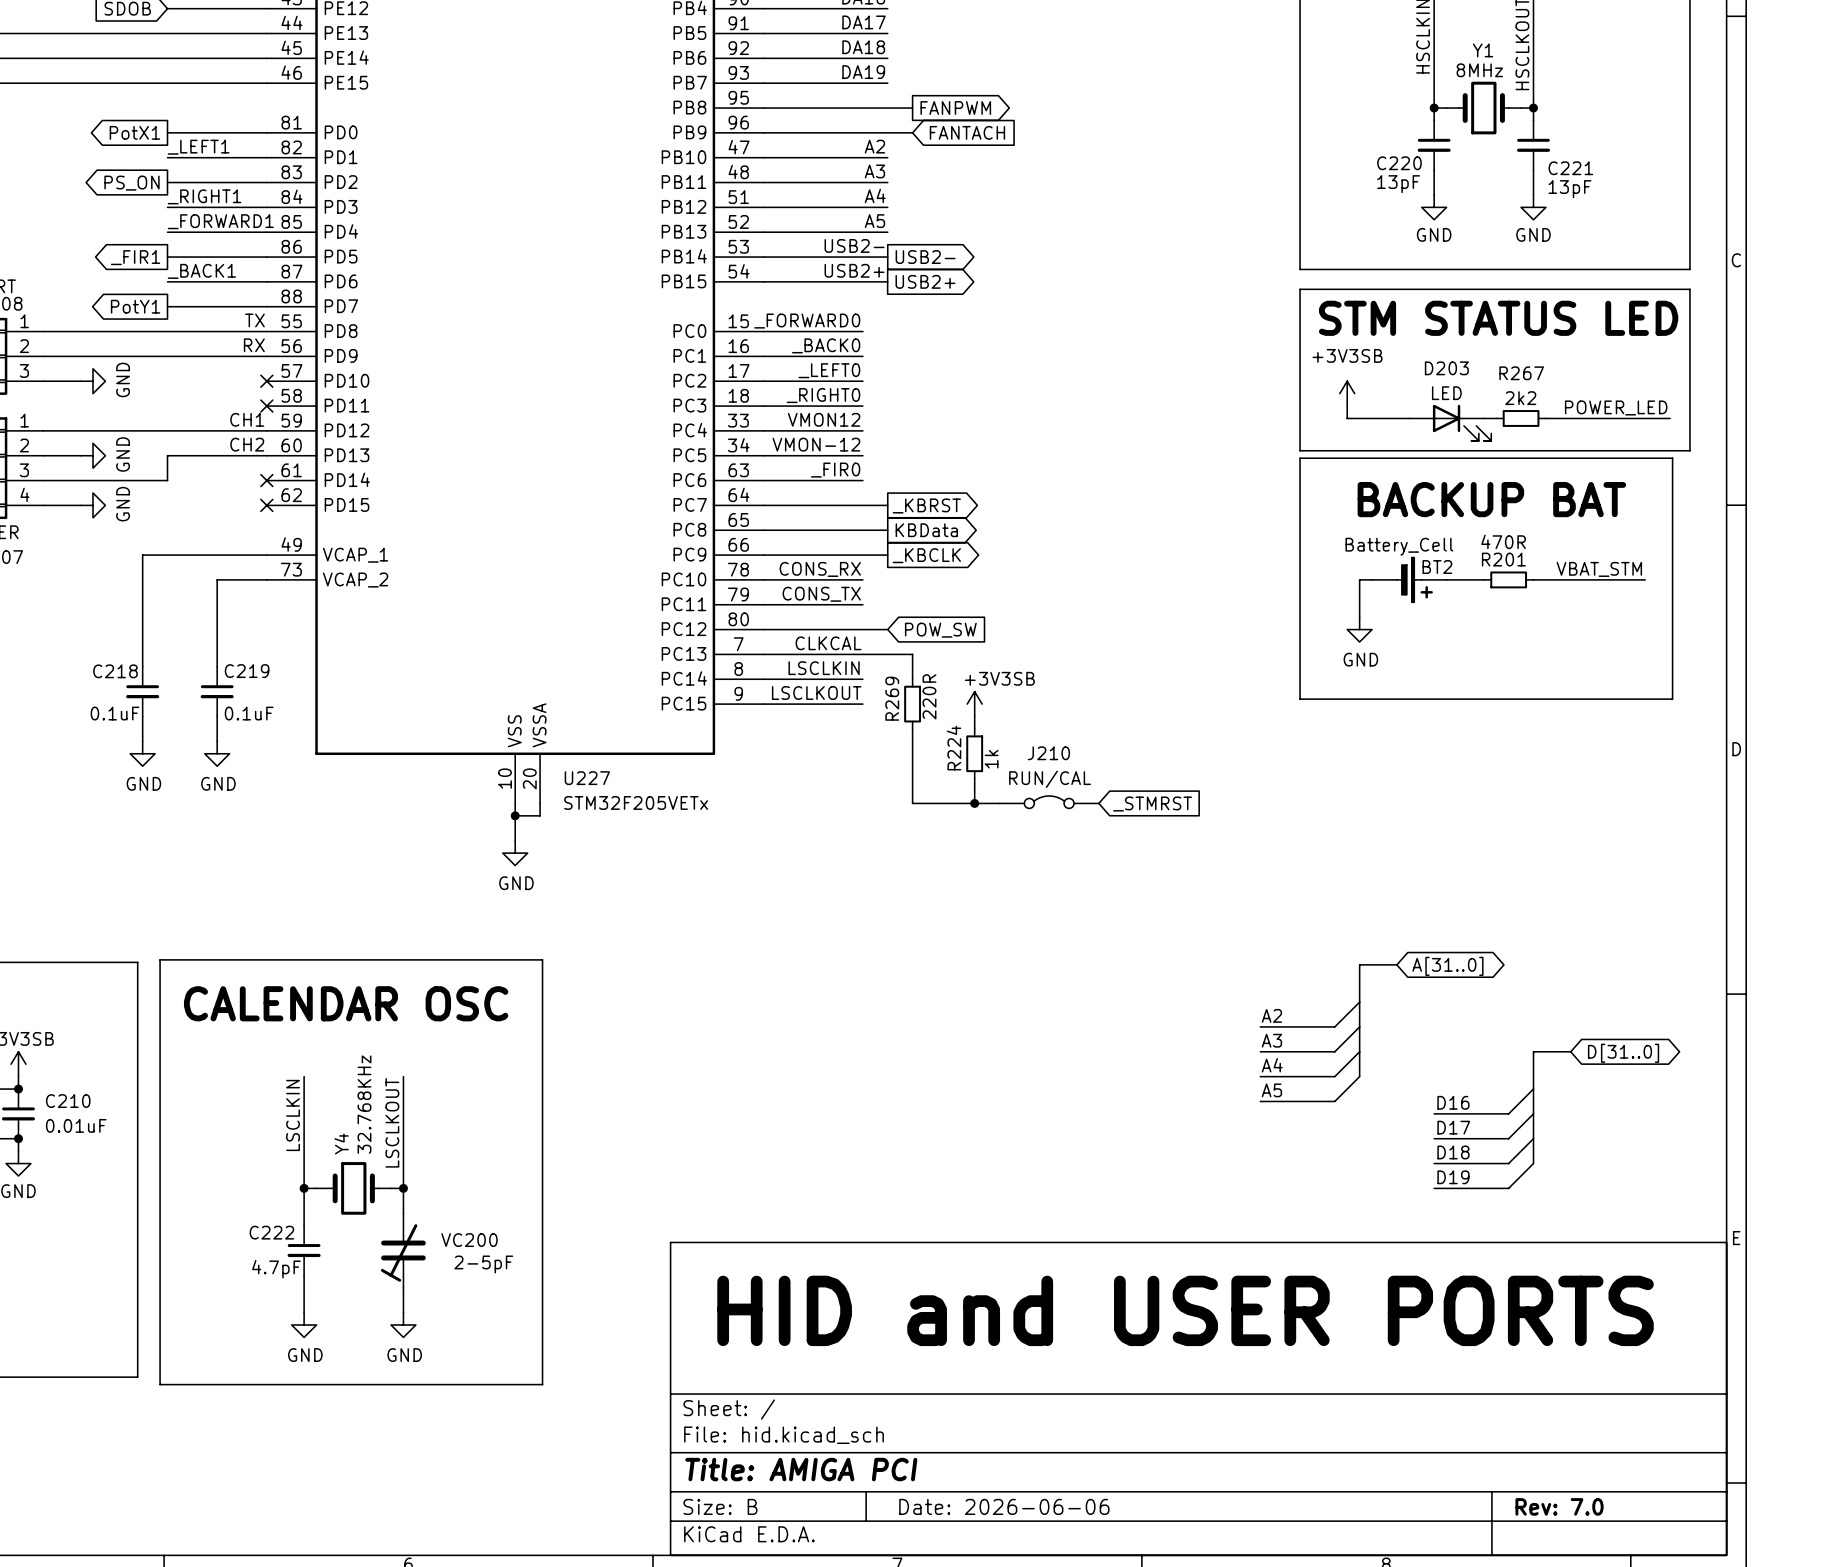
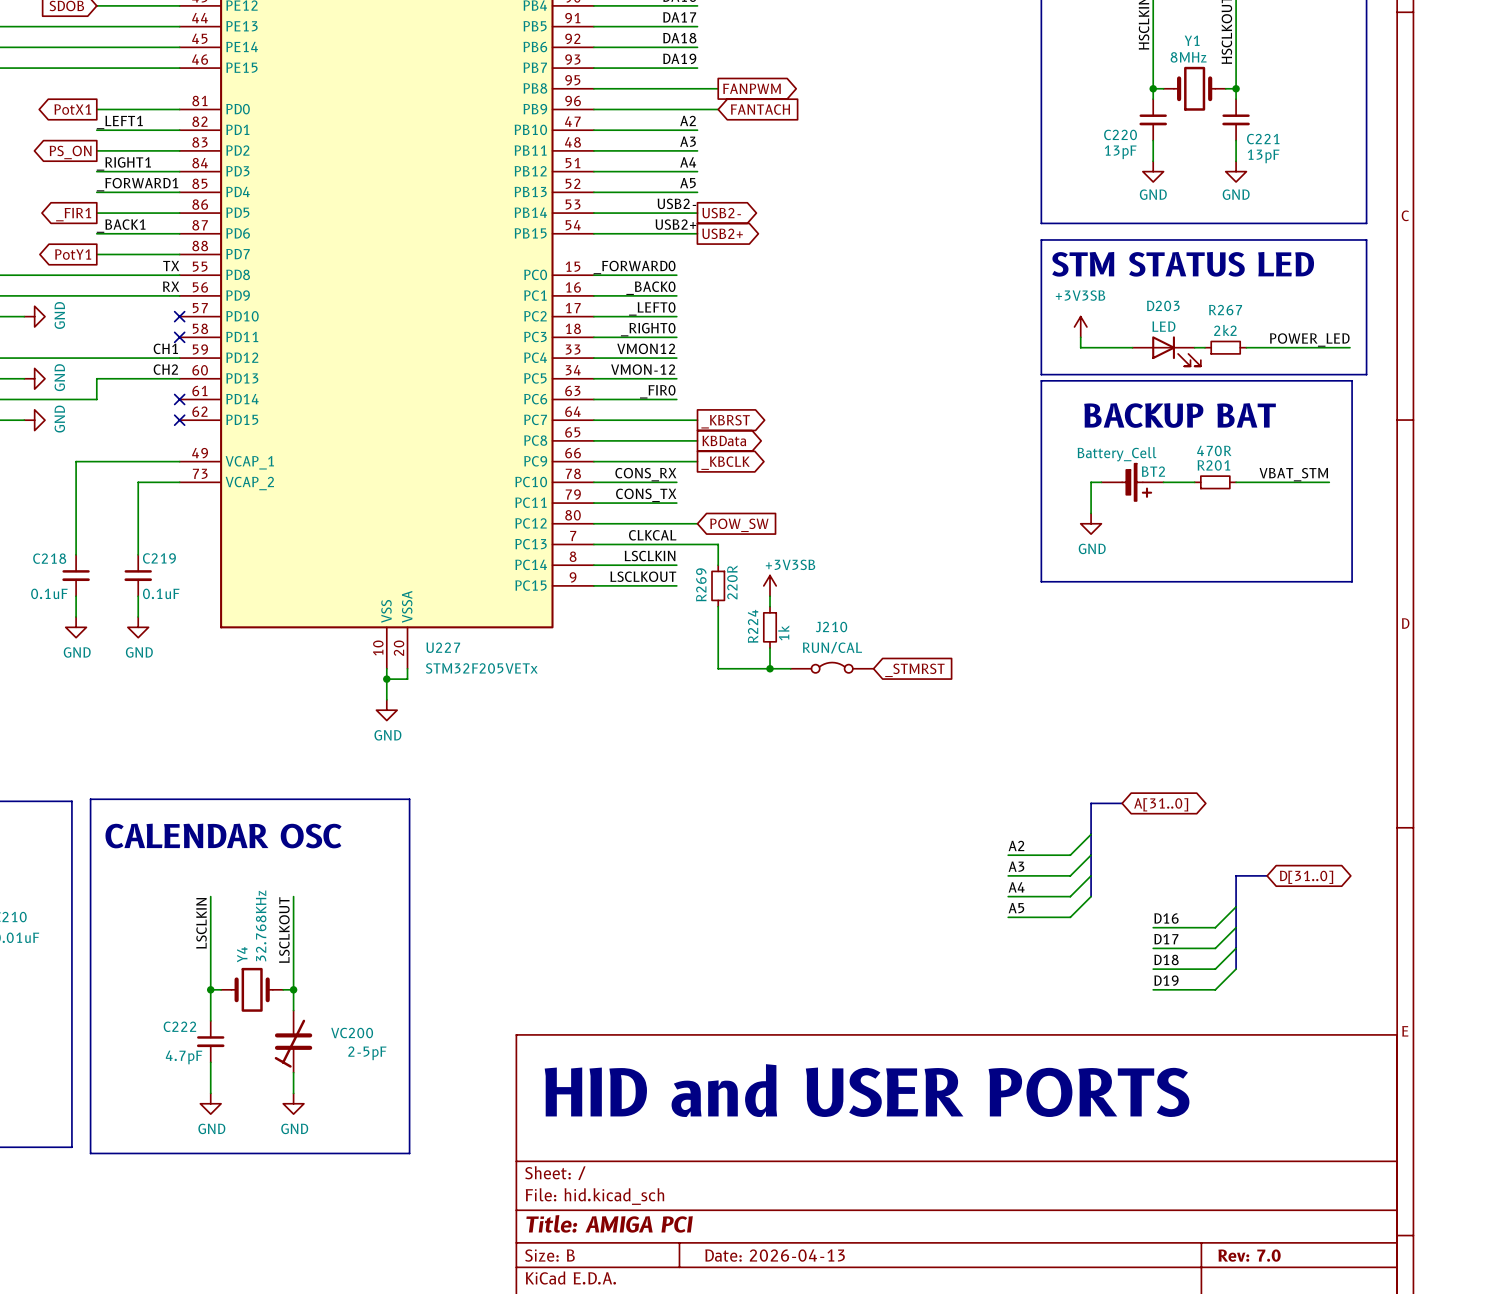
title block: Date: 2026-06-06 (1004, 1506) -> Date: 2026-04-13 (775, 1255)

